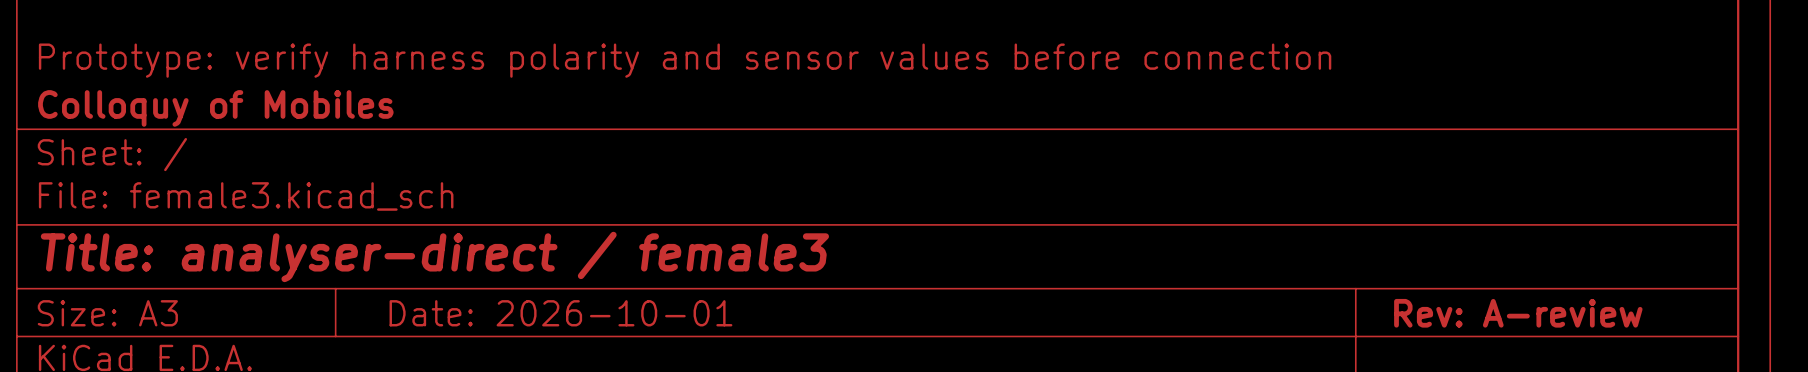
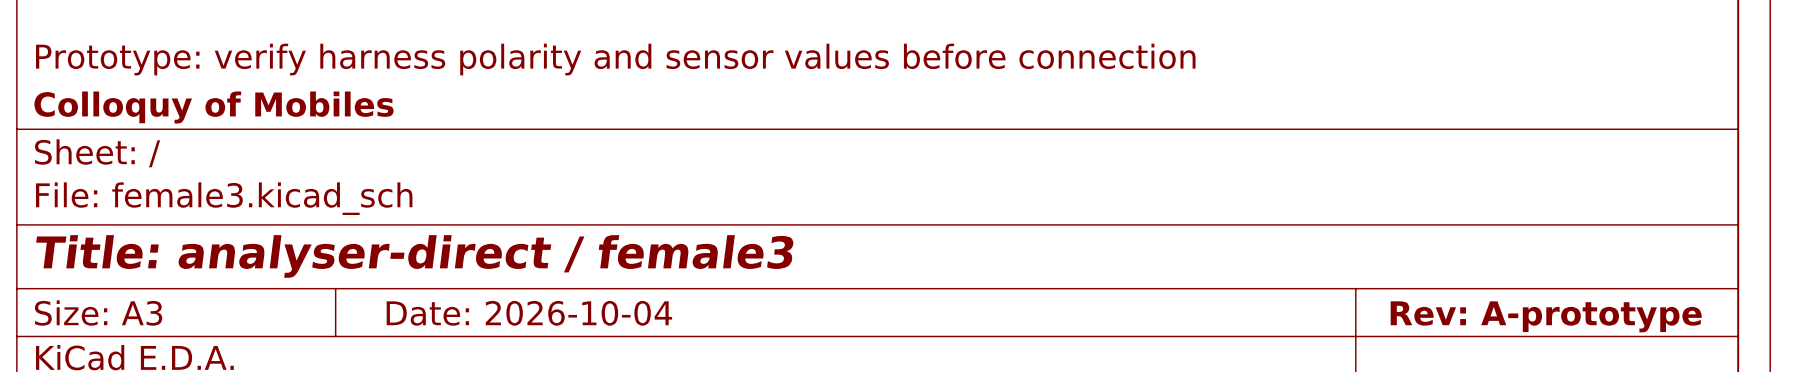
title block: Date: 2026-10-01 (560, 313) -> Date: 2026-10-04 (529, 313)
title block: Rev: A-review (1518, 313) -> Rev: A-prototype (1546, 316)

